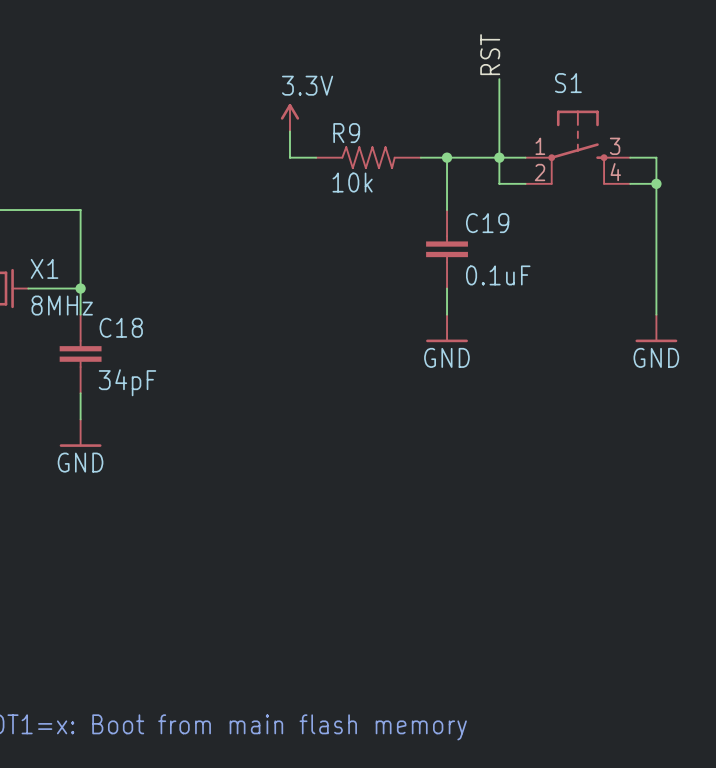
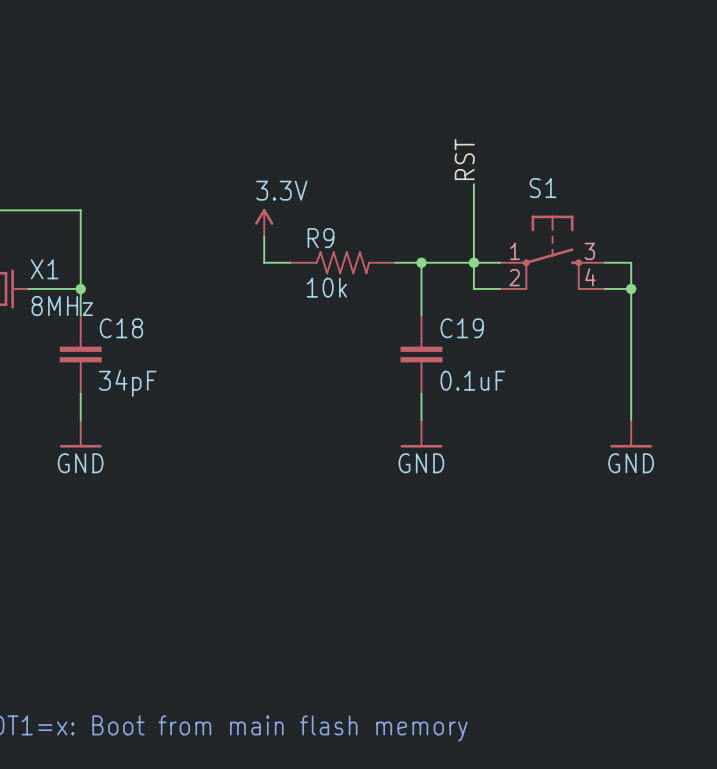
label position: RST (490, 54) -> RST (464, 159)
wire: (499, 79) (499, 183) (525, 183) -> (473, 184) (473, 288) (500, 288)
power symbol position: 3.3V (289, 117) -> 3.3V (264, 222)
wire: (289, 131) (289, 157) (316, 157) -> (264, 236) (264, 262) (290, 262)
S1 position: (577, 147) -> (552, 252)
R9 position: (368, 157) -> (342, 262)
wire: (420, 157) (525, 157) -> (395, 262) (500, 262)
wire: (447, 157) (447, 210) -> (421, 262) (421, 315)
junction: (447, 157) -> none
junction: (499, 157) -> none
wire: (630, 157) (656, 157) (656, 314) -> (604, 262) (631, 262) (631, 420)
wire: (630, 183) (656, 183) -> (604, 288) (631, 288)
junction: (656, 183) -> none
C19 position: (447, 249) -> (421, 354)
junction: none -> (421, 262)
junction: none -> (473, 262)
wire: (447, 288) (447, 314) -> (421, 393) (421, 420)
junction: none -> (631, 288)
power symbol: GND (447, 328) -> none
power symbol: GND (656, 328) -> none
power symbol: none -> GND (421, 433)
power symbol: none -> GND (631, 433)

